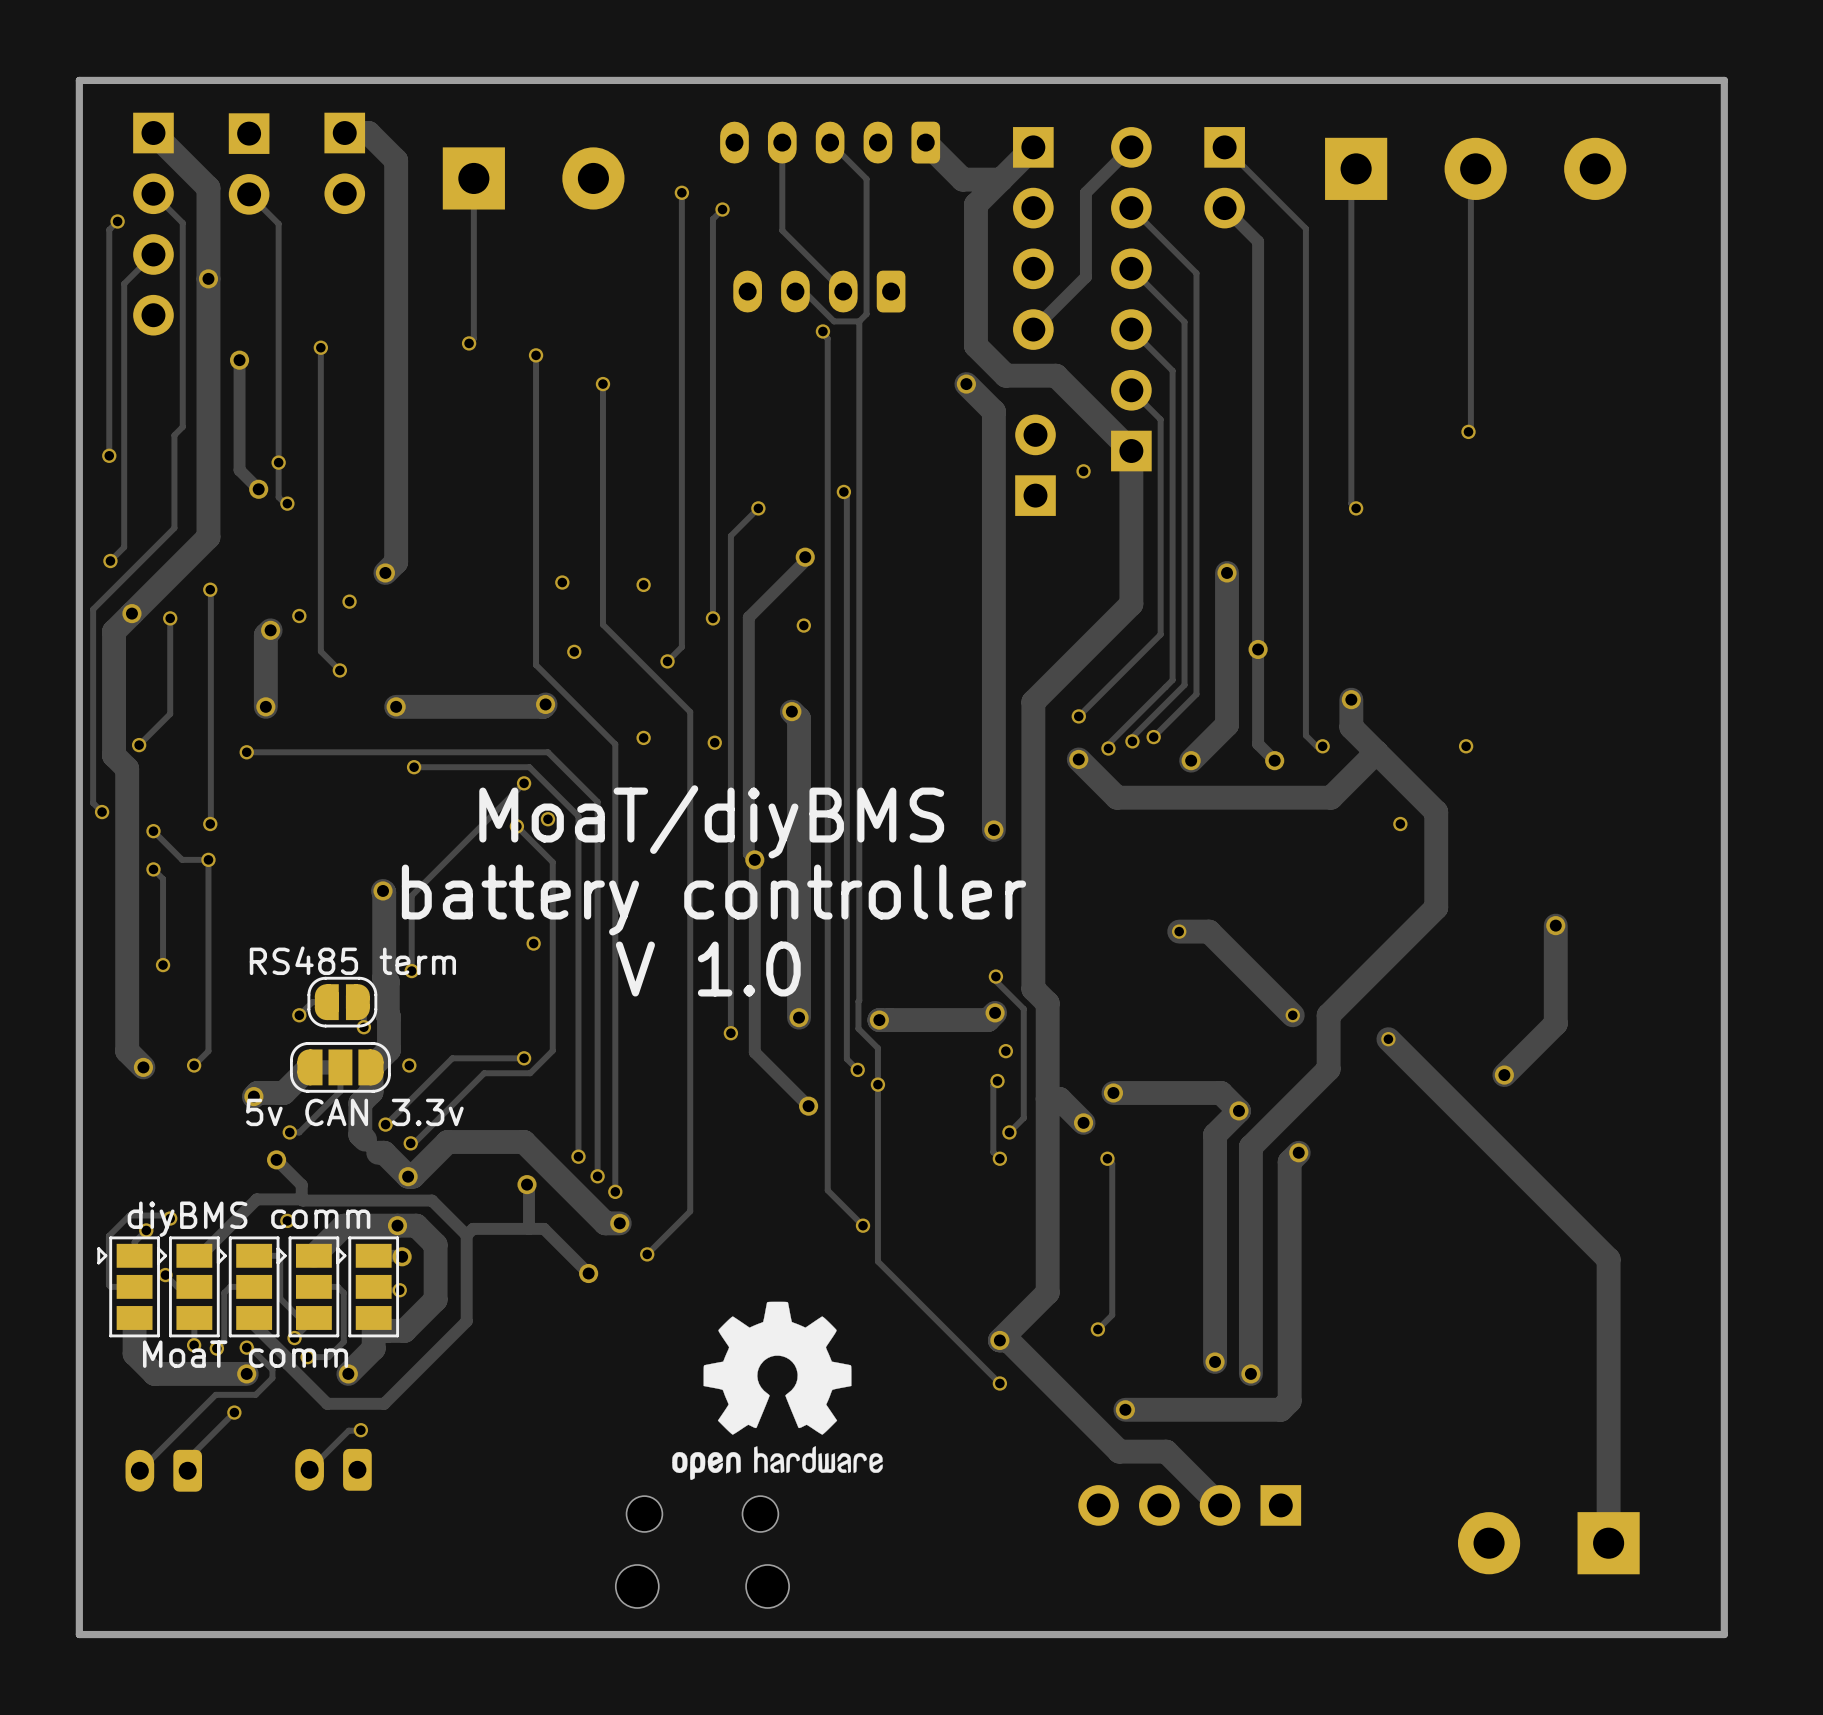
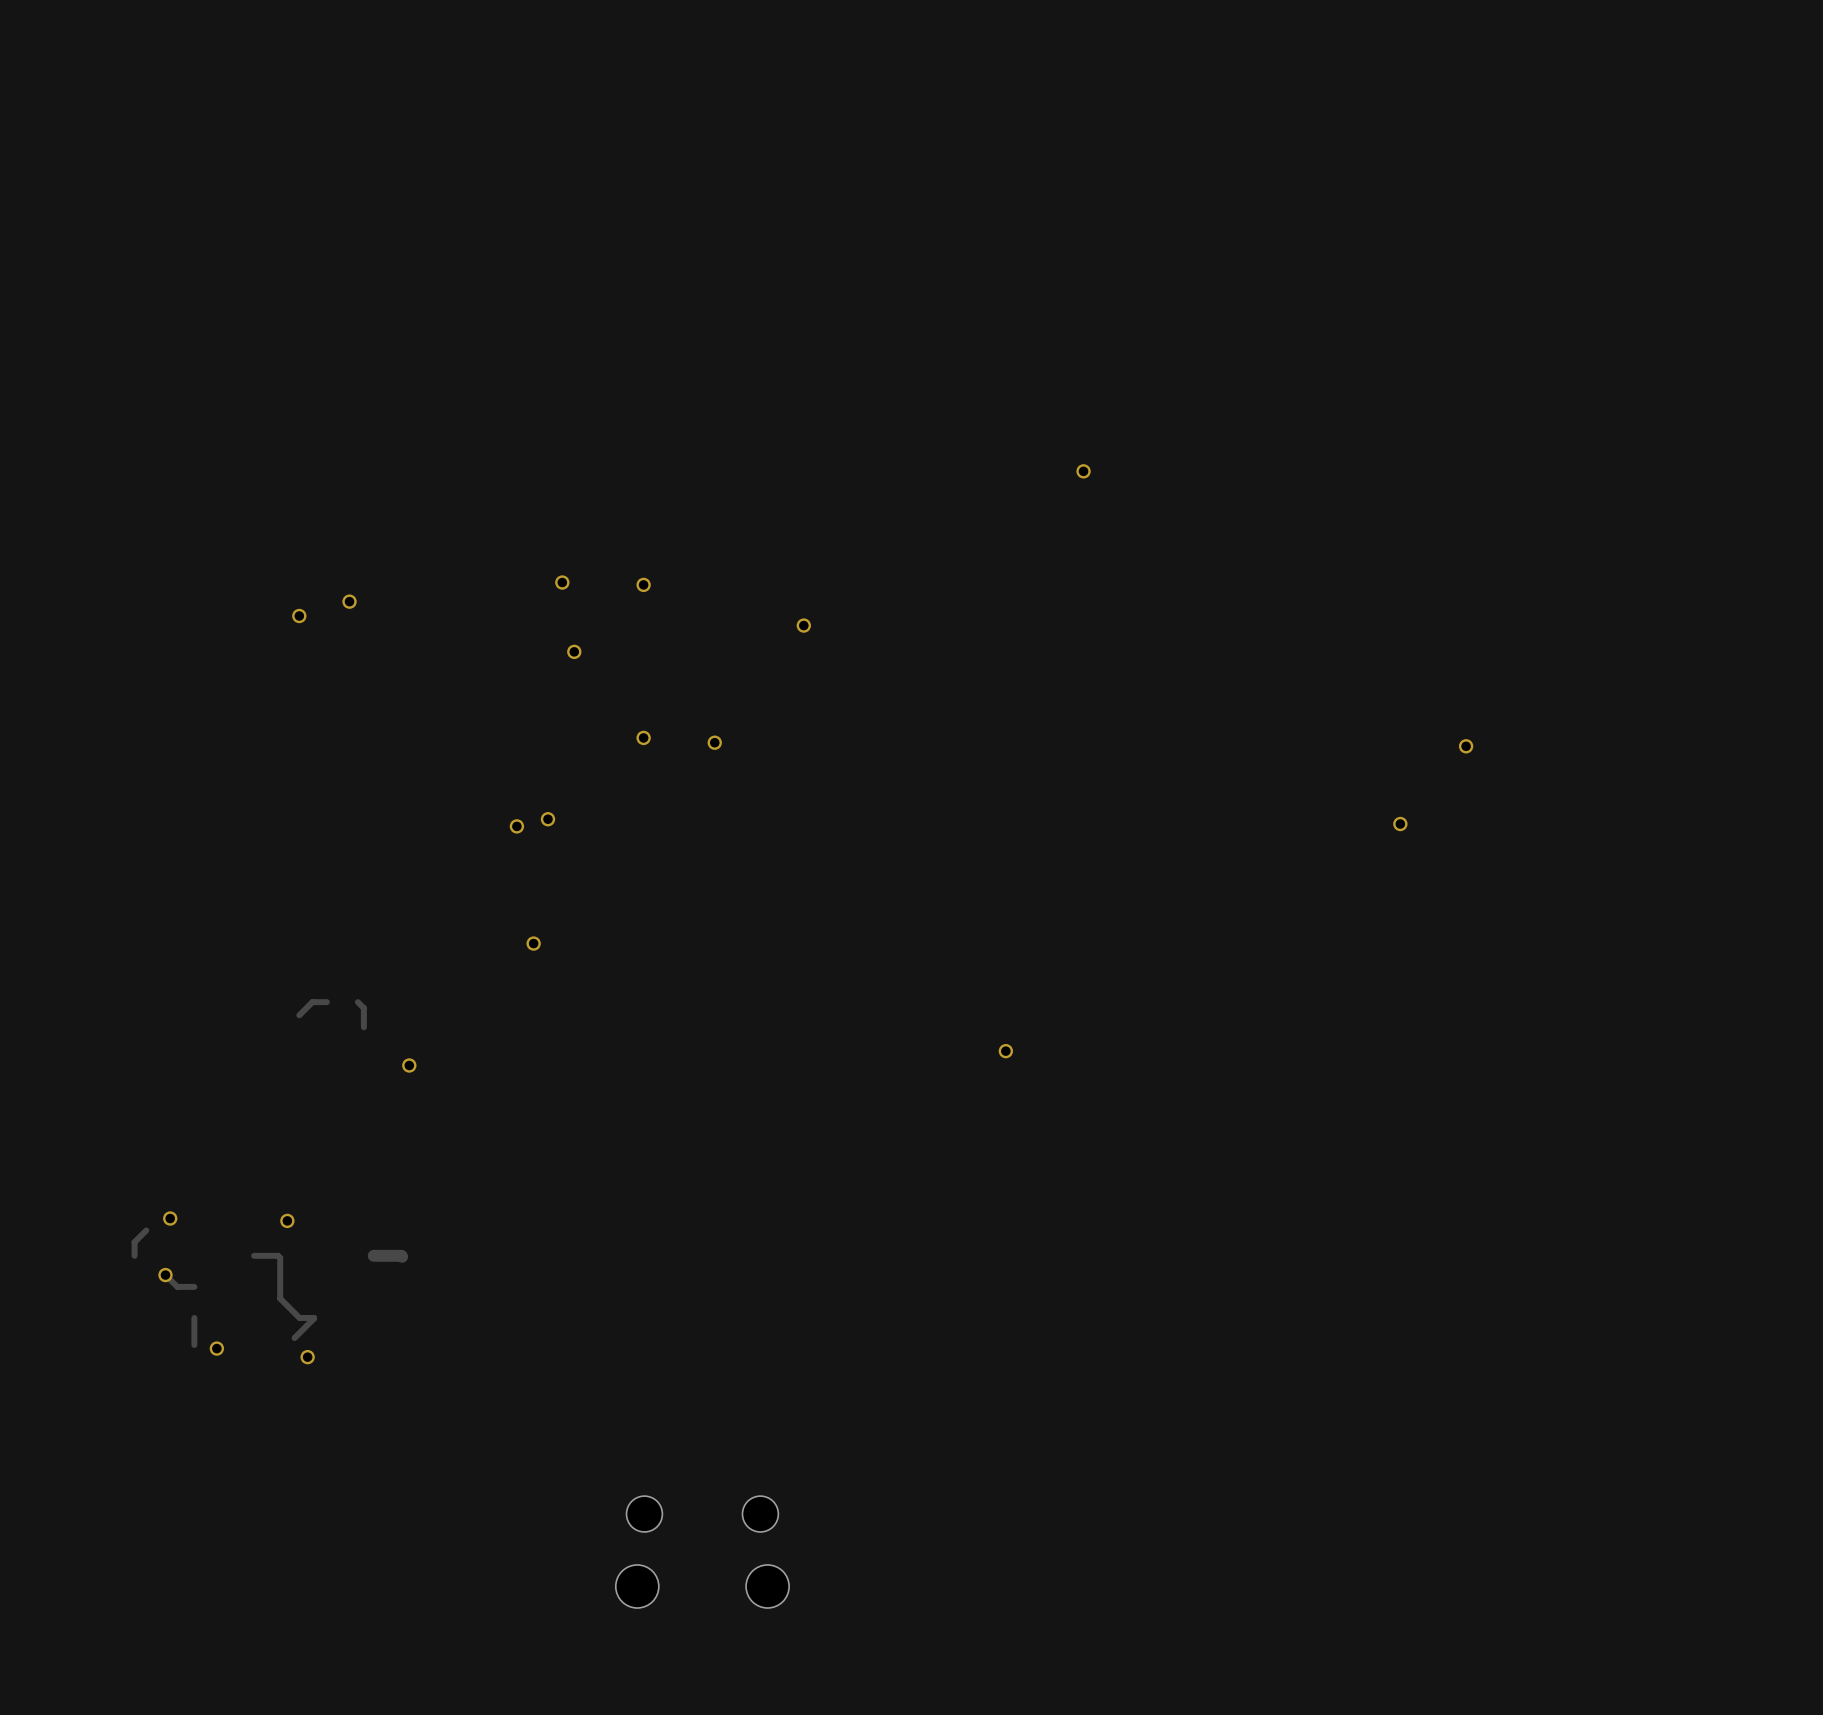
board edge: (1724, 80) (79, 80) (79, 1634) (1724, 1634) (1724, 80) -> none
track: (153, 133) (208, 188) (208, 537) (114, 631) (114, 755) (127, 768) (127, 1051) (143, 1067) -> none
track: (344, 133) (368, 133) (396, 160) (396, 562) (385, 572) -> none
track: (782, 142) (782, 230) (843, 291) -> none
track: (830, 142) (866, 179) (866, 314) (859, 321) -> none
part: (830, 142) -> none
track: (925, 142) (962, 179) (1001, 179) -> none
track: (1033, 147) (975, 204) (975, 345) (1005, 375) (1056, 375) (1131, 451) (1131, 604) (1033, 702) (1033, 988) (1047, 1003) (1047, 1292) (999, 1340) (1008, 1340) (1119, 1451) (1166, 1451) (1220, 1505) -> none
track: (1131, 147) (1085, 192) (1085, 276) (1033, 329) -> none
track: (1224, 147) (1305, 228) (1305, 735) (1316, 746) (1322, 746) -> none
part: (249, 163) -> none
part: (344, 163) -> none
track: (1356, 168) (1351, 173) (1351, 503) (1356, 508) -> none
track: (1475, 168) (1470, 173) (1470, 429) (1468, 431) -> none
part: (1475, 168) -> none
part: (1224, 177) -> none
track: (473, 178) (473, 338) (469, 343) -> none
part: (533, 178) -> none
track: (681, 192) (681, 647) (667, 661) -> none
via: (681, 192) -> none
track: (153, 193) (182, 223) (182, 426) (174, 435) (174, 528) (93, 609) (93, 803) (102, 812) -> none
track: (249, 194) (278, 223) (278, 497) (287, 503) -> none
track: (1131, 208) (1196, 273) (1196, 694) (1153, 737) -> none
track: (1224, 208) (1258, 241) (1258, 744) (1274, 760) -> none
track: (722, 209) (712, 219) (712, 618) -> none
via: (722, 209) -> none
track: (117, 221) (109, 229) (109, 455) -> none
via: (117, 221) -> none
part: (153, 224) -> none
part: (1033, 238) -> none
track: (153, 254) (124, 283) (124, 547) (110, 561) -> none
track: (1131, 268) (1184, 321) (1184, 685) (1132, 737) (1132, 741) -> none
via: (208, 278) -> none
track: (795, 291) (804, 291) (834, 321) (859, 321) -> none
part: (819, 291) -> none
part: (1131, 299) -> none
track: (859, 321) (858, 1028) (877, 1048) (877, 1261) (999, 1383) -> none
track: (1131, 329) (1172, 370) (1172, 680) (1108, 744) (1108, 748) -> none
track: (822, 331) (827, 338) (827, 1190) (863, 1225) -> none
via: (822, 331) -> none
via: (469, 343) -> none
track: (320, 347) (320, 651) (339, 670) -> none
via: (320, 347) -> none
track: (536, 355) (536, 665) (615, 744) (615, 1191) -> none
via: (536, 355) -> none
track: (239, 360) (239, 470) (258, 489) -> none
via: (239, 360) -> none
track: (602, 384) (602, 624) (690, 711) (690, 1211) (647, 1254) -> none
via: (602, 384) -> none
track: (966, 384) (993, 411) (993, 829) -> none
via: (966, 384) -> none
track: (1131, 390) (1160, 419) (1160, 634) (1078, 716) -> none
via: (1468, 431) -> none
via: (109, 455) -> none
via: (278, 462) -> none
part: (1035, 465) -> none
via: (258, 489) -> none
track: (843, 491) (846, 494) (846, 1059) (857, 1069) -> none
via: (843, 491) -> none
via: (287, 503) -> none
track: (758, 508) (730, 535) (730, 1033) -> none
via: (758, 508) -> none
via: (1356, 508) -> none
via: (805, 557) -> none
track: (807, 559) (748, 617) (748, 853) (754, 859) (754, 1052) (808, 1106) -> none
via: (110, 561) -> none
via: (385, 572) -> none
track: (1227, 572) (1227, 724) (1191, 760) -> none
via: (1227, 572) -> none
track: (210, 589) (210, 824) -> none
via: (210, 589) -> none
via: (131, 613) -> none
track: (170, 618) (170, 714) (139, 745) -> none
via: (170, 618) -> none
via: (712, 618) -> none
track: (270, 630) (265, 635) (265, 706) -> none
via: (270, 630) -> none
via: (1258, 649) -> none
via: (667, 661) -> none
via: (339, 670) -> none
track: (1351, 699) (1351, 727) (1436, 812) (1436, 907) (1328, 1015) (1328, 1069) (1250, 1146) (1250, 1373) -> none
via: (1351, 699) -> none
track: (545, 704) (543, 706) (396, 706) -> none
via: (545, 704) -> none
via: (265, 706) -> none
via: (396, 706) -> none
track: (791, 711) (799, 718) (799, 1017) -> none
via: (791, 711) -> none
via: (1078, 716) -> none
via: (1153, 737) -> none
via: (1132, 741) -> none
via: (139, 745) -> none
via: (1322, 746) -> none
via: (1108, 748) -> none
track: (246, 752) (547, 752) (597, 801) (597, 1176) -> none
via: (246, 752) -> none
track: (1376, 752) (1331, 797) (1117, 797) (1078, 759) -> none
via: (1078, 759) -> none
via: (1191, 760) -> none
via: (1274, 760) -> none
track: (414, 767) (529, 767) (578, 816) (578, 1156) -> none
via: (414, 767) -> none
track: (524, 783) (411, 895) (411, 971) -> none
via: (524, 783) -> none
via: (102, 812) -> none
text: MoaT/diyBMS (711, 821) -> none
via: (210, 824) -> none
track: (516, 826) (552, 862) (552, 1050) (530, 1073) (484, 1073) (414, 1143) (410, 1143) -> none
via: (993, 829) -> none
track: (153, 831) (182, 859) (208, 859) (208, 1051) (194, 1065) -> none
via: (153, 831) -> none
via: (208, 859) -> none
via: (754, 859) -> none
track: (153, 869) (163, 879) (163, 965) -> none
via: (153, 869) -> none
track: (383, 890) (384, 978) (387, 981) (388, 1049) (371, 1067) (371, 1092) (360, 1103) (360, 1134) (365, 1139) -> none
via: (383, 890) -> none
text: battery controller (713, 900) -> none
track: (1555, 925) (1555, 1023) (1504, 1075) -> none
via: (1555, 925) -> none
track: (1179, 931) (1209, 931) (1292, 1015) -> none
via: (1179, 931) -> none
text: RS485 term (352, 960) -> none
via: (163, 965) -> none
text: V 1.0 (708, 969) -> none
via: (411, 971) -> none
track: (995, 976) (995, 981) (1023, 1008) (1023, 1118) (1009, 1132) -> none
via: (995, 976) -> none
part: (342, 1002) -> none
track: (995, 1012) (987, 1020) (879, 1020) -> none
via: (995, 1012) -> none
via: (299, 1015) -> none
via: (1292, 1015) -> none
via: (799, 1017) -> none
via: (879, 1020) -> none
via: (363, 1027) -> none
via: (730, 1033) -> none
track: (1388, 1039) (1608, 1259) (1608, 1543) -> none
via: (1388, 1039) -> none
track: (524, 1058) (452, 1058) (385, 1124) -> none
via: (524, 1058) -> none
via: (194, 1065) -> none
via: (143, 1067) -> none
track: (309, 1067) (283, 1092) (257, 1092) (253, 1096) -> none
track: (340, 1067) (340, 1091) (299, 1132) (289, 1132) -> none
part: (340, 1067) -> none
via: (857, 1069) -> none
via: (1504, 1075) -> none
track: (997, 1081) (993, 1085) (993, 1152) (999, 1158) -> none
via: (997, 1081) -> none
via: (877, 1084) -> none
track: (1113, 1092) (1221, 1092) (1238, 1110) (1215, 1134) (1215, 1361) -> none
via: (1113, 1092) -> none
via: (253, 1096) -> none
track: (1047, 1098) (1059, 1098) (1083, 1122) -> none
via: (808, 1106) -> none
via: (1238, 1110) -> none
text: 5v CAN 3.3v (354, 1112) -> none
via: (1083, 1122) -> none
via: (385, 1124) -> none
via: (289, 1132) -> none
via: (1009, 1132) -> none
via: (410, 1143) -> none
track: (378, 1152) (384, 1152) (408, 1176) (412, 1176) (447, 1142) (524, 1142) (605, 1223) (619, 1223) -> none
track: (1298, 1152) (1289, 1161) (1289, 1400) (1280, 1409) (1125, 1409) -> none
via: (1298, 1152) -> none
via: (578, 1156) -> none
via: (999, 1158) -> none
track: (1107, 1158) (1112, 1163) (1112, 1315) (1097, 1329) -> none
via: (1107, 1158) -> none
track: (276, 1159) (301, 1185) (301, 1199) -> none
via: (276, 1159) -> none
via: (408, 1176) -> none
via: (597, 1176) -> none
track: (527, 1184) (529, 1186) (529, 1228) -> none
via: (527, 1184) -> none
via: (615, 1191) -> none
track: (301, 1199) (256, 1199) (200, 1255) (194, 1255) -> none
track: (301, 1199) (432, 1200) (466, 1235) -> none
track: (170, 1218) (167, 1215) (129, 1215) (108, 1236) (108, 1285) (110, 1286) (134, 1286) -> none
text: diyBMS comm (249, 1219) -> none
via: (619, 1223) -> none
via: (397, 1225) -> none
via: (863, 1225) -> none
via: (146, 1230) -> none
track: (466, 1235) (466, 1321) (384, 1403) (327, 1403) (287, 1363) (287, 1357) (254, 1324) (254, 1317) -> none
track: (466, 1235) (473, 1228) (544, 1228) (588, 1273) -> none
via: (647, 1254) -> none
track: (313, 1255) (344, 1225) (416, 1225) (435, 1244) (435, 1299) (404, 1330) (386, 1330) (373, 1317) (373, 1348) (348, 1373) -> none
via: (402, 1256) -> none
via: (588, 1273) -> none
part: (128, 1286) -> none
part: (188, 1286) -> none
part: (248, 1286) -> none
track: (254, 1286) (230, 1286) (224, 1292) (224, 1341) (216, 1348) -> none
part: (307, 1286) -> none
track: (313, 1286) (337, 1286) (343, 1292) (343, 1341) (328, 1357) (307, 1357) -> none
part: (367, 1286) -> none
via: (399, 1290) -> none
drawing: [672, 1301, 883, 1480] -> none
track: (134, 1317) (134, 1353) (154, 1373) (246, 1373) -> none
via: (1097, 1329) -> none
via: (294, 1338) -> none
via: (999, 1340) -> none
via: (194, 1345) -> none
track: (246, 1347) (250, 1347) (272, 1369) (272, 1378) (255, 1394) (215, 1394) (139, 1470) -> none
via: (246, 1347) -> none
text: MoaT comm (245, 1354) -> none
via: (1215, 1361) -> none
via: (246, 1373) -> none
via: (348, 1373) -> none
via: (1250, 1373) -> none
via: (999, 1383) -> none
via: (1125, 1409) -> none
track: (234, 1412) (187, 1459) (187, 1470) -> none
via: (234, 1412) -> none
track: (360, 1430) (348, 1430) (309, 1469) -> none
via: (360, 1430) -> none
part: (333, 1469) -> none
part: (163, 1470) -> none
part: (1189, 1505) -> none
part: (1548, 1543) -> none

